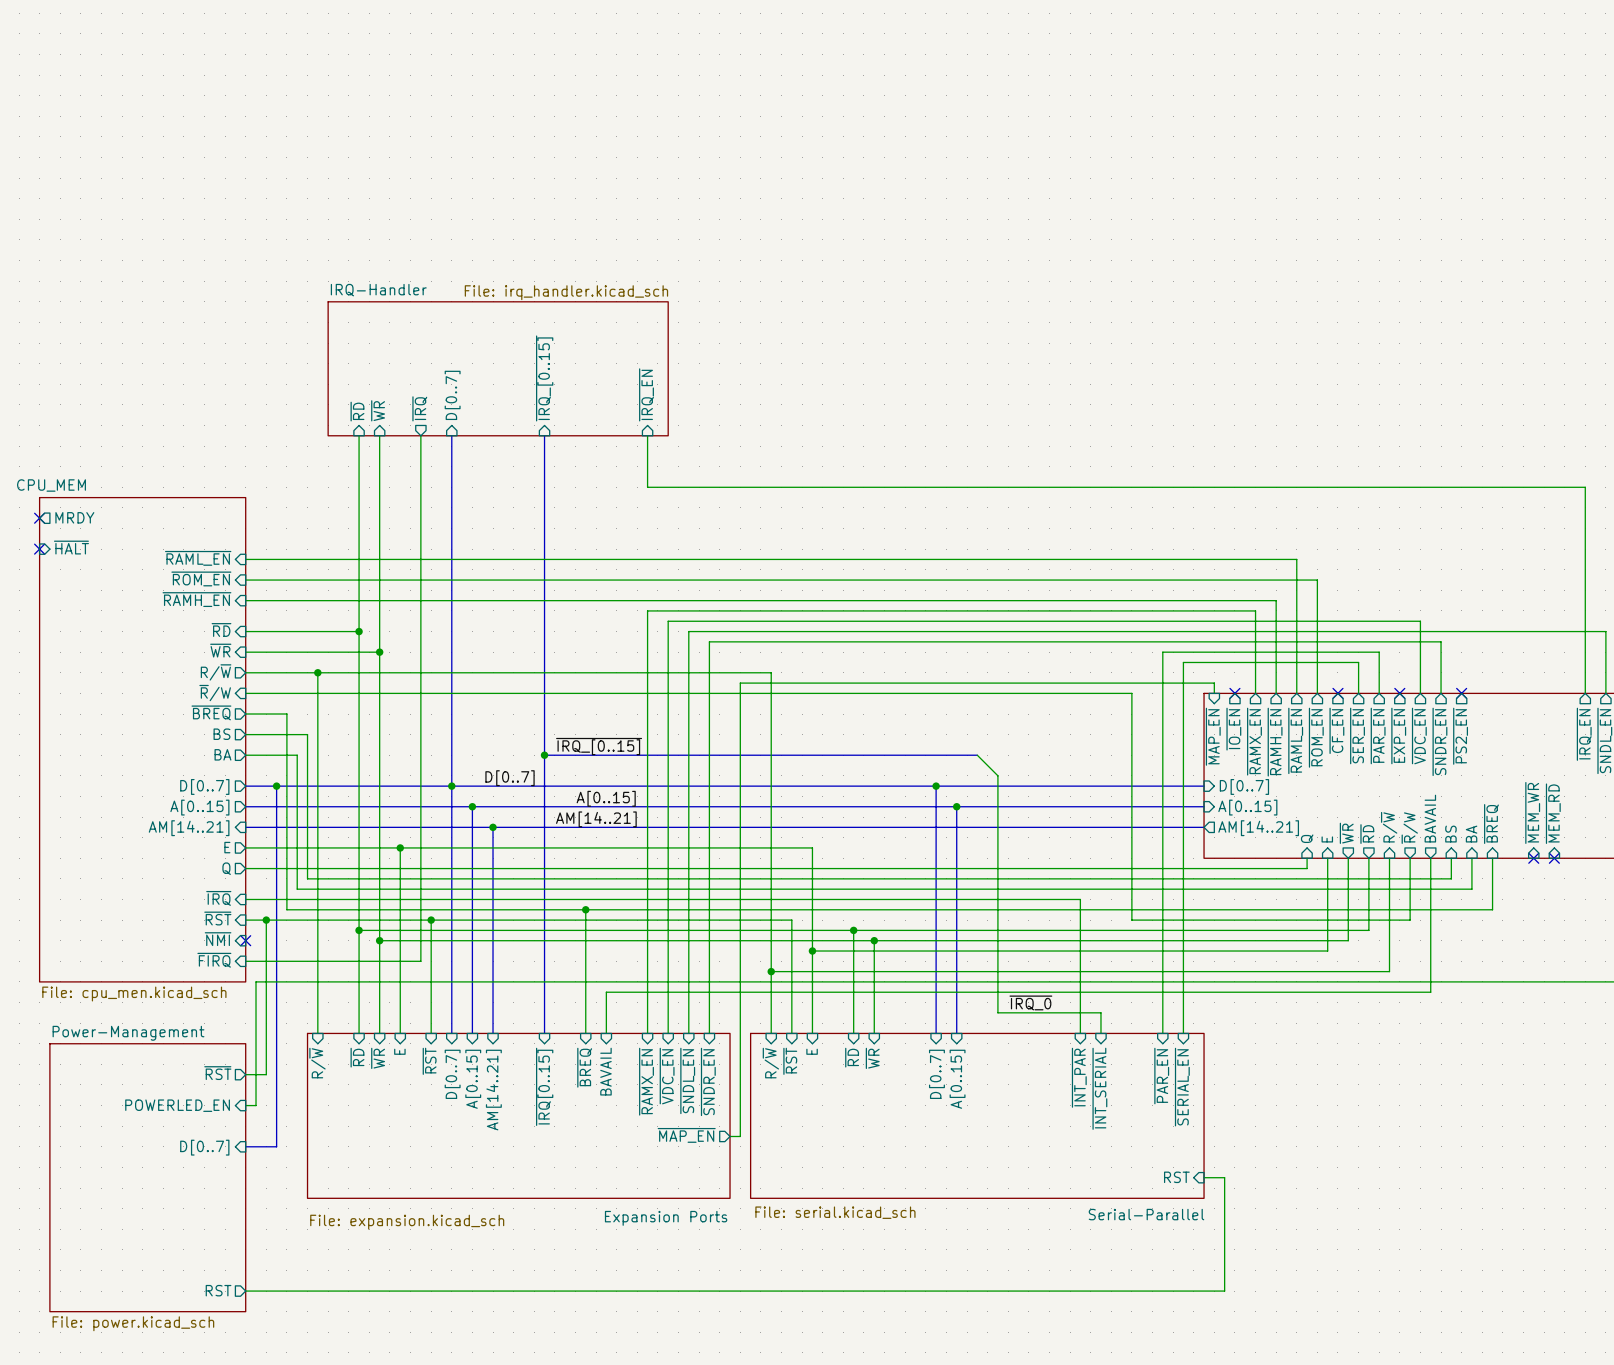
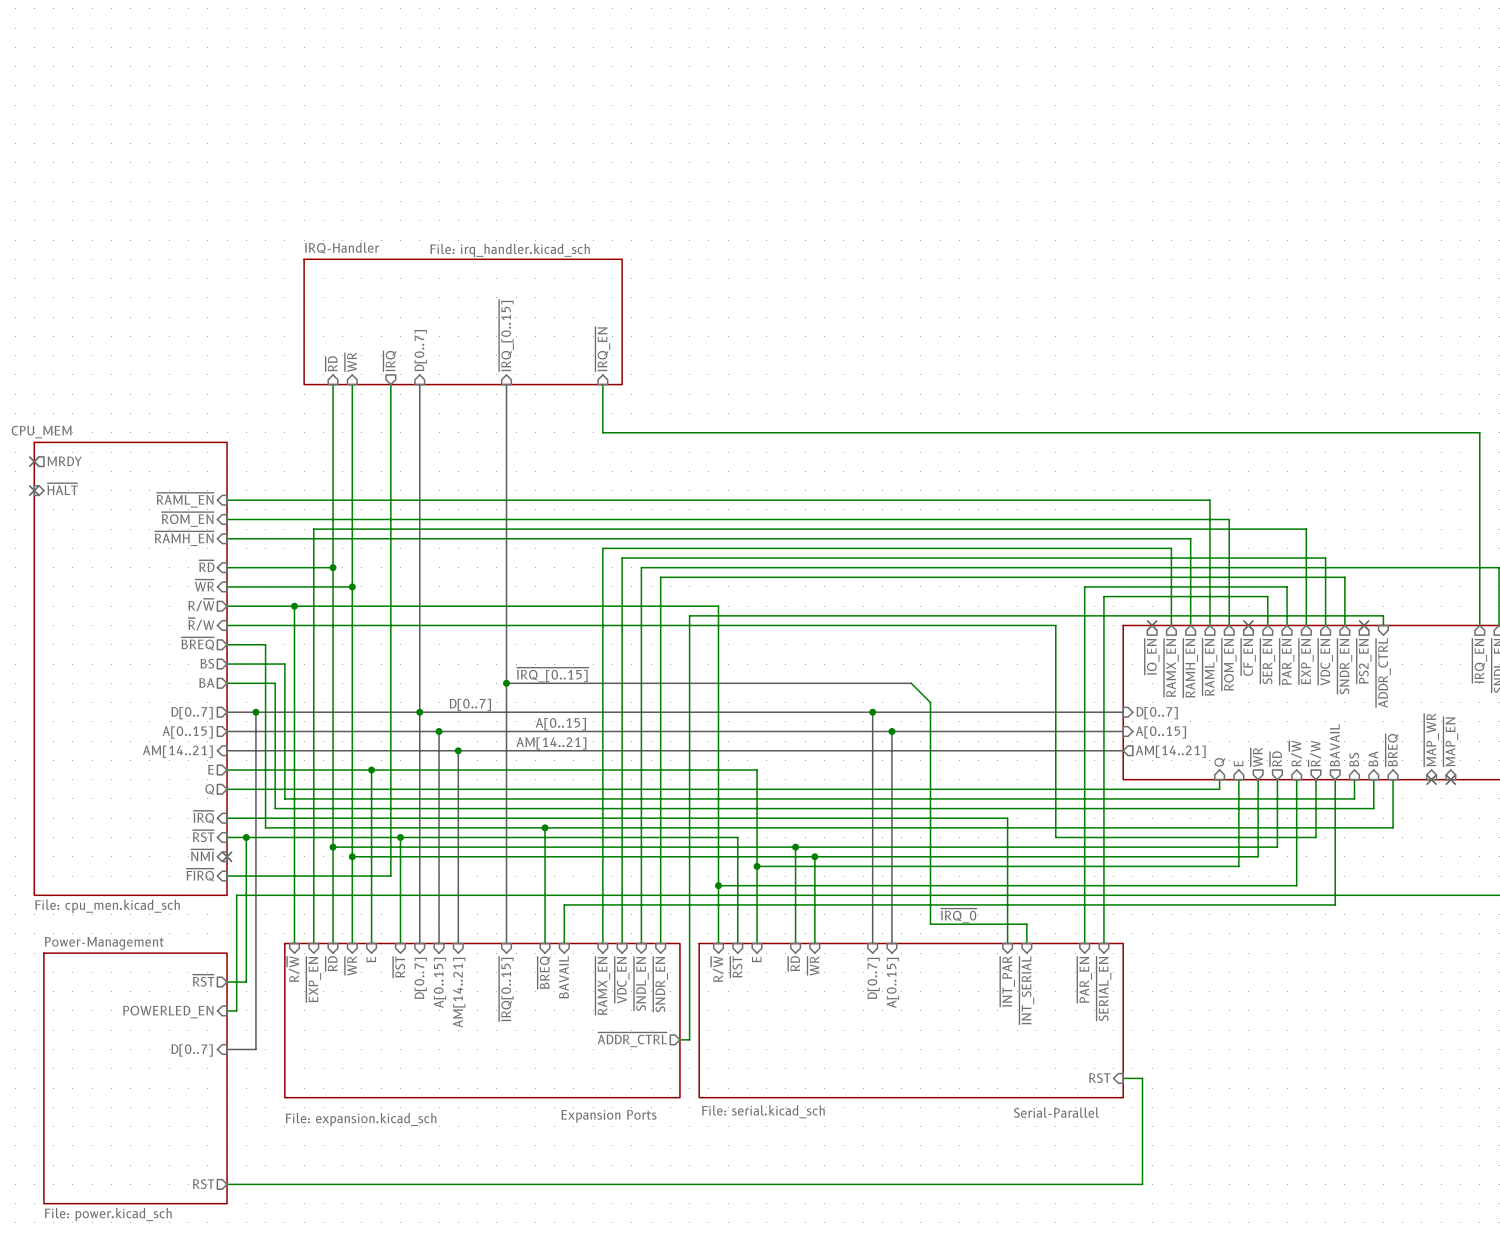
wire: (1214, 683) (1214, 693) -> (1132, 615) (1383, 615) (1383, 625)
wire: none -> (1306, 625) (1306, 529) (313, 529) (313, 943)
no-connect mark: (1399, 693) -> none
sheet pin: ~{MAP_EN} (1213, 736) -> none
sheet pin: none -> ~{ADDR_CTRL} (1383, 672)
sheet pin: ~{MEM_WR} (1532, 812) -> ~{MAP_WR} (1431, 739)
sheet pin: ~{MEM_RD} (1553, 813) -> ~{MAP_EN} (1450, 741)
sheet pin: none -> ~{EXP_EN} (313, 979)
sheet pin: ~{MAP_EN} (686, 1135) -> ~{ADDR_CTRL} (632, 1039)

